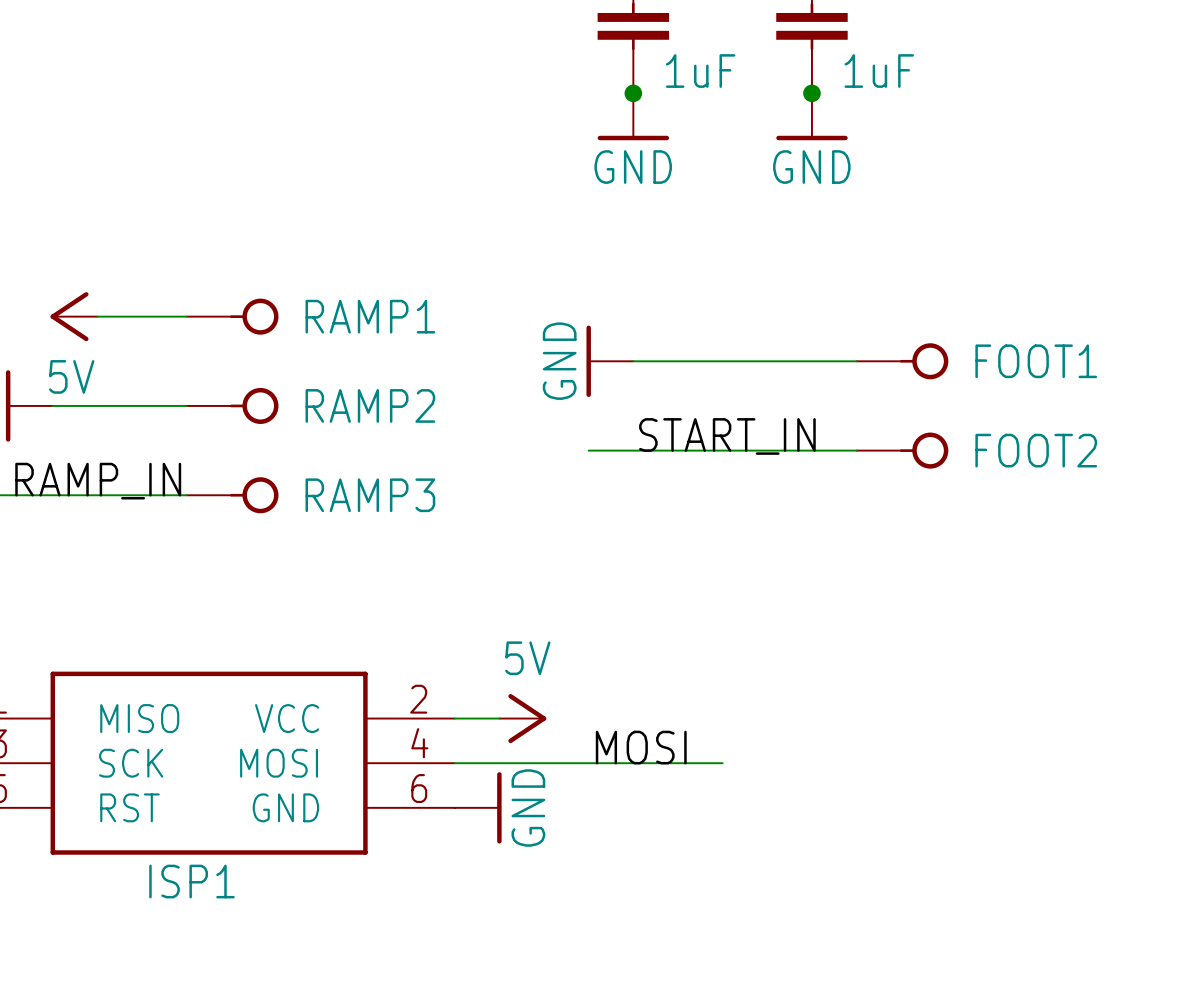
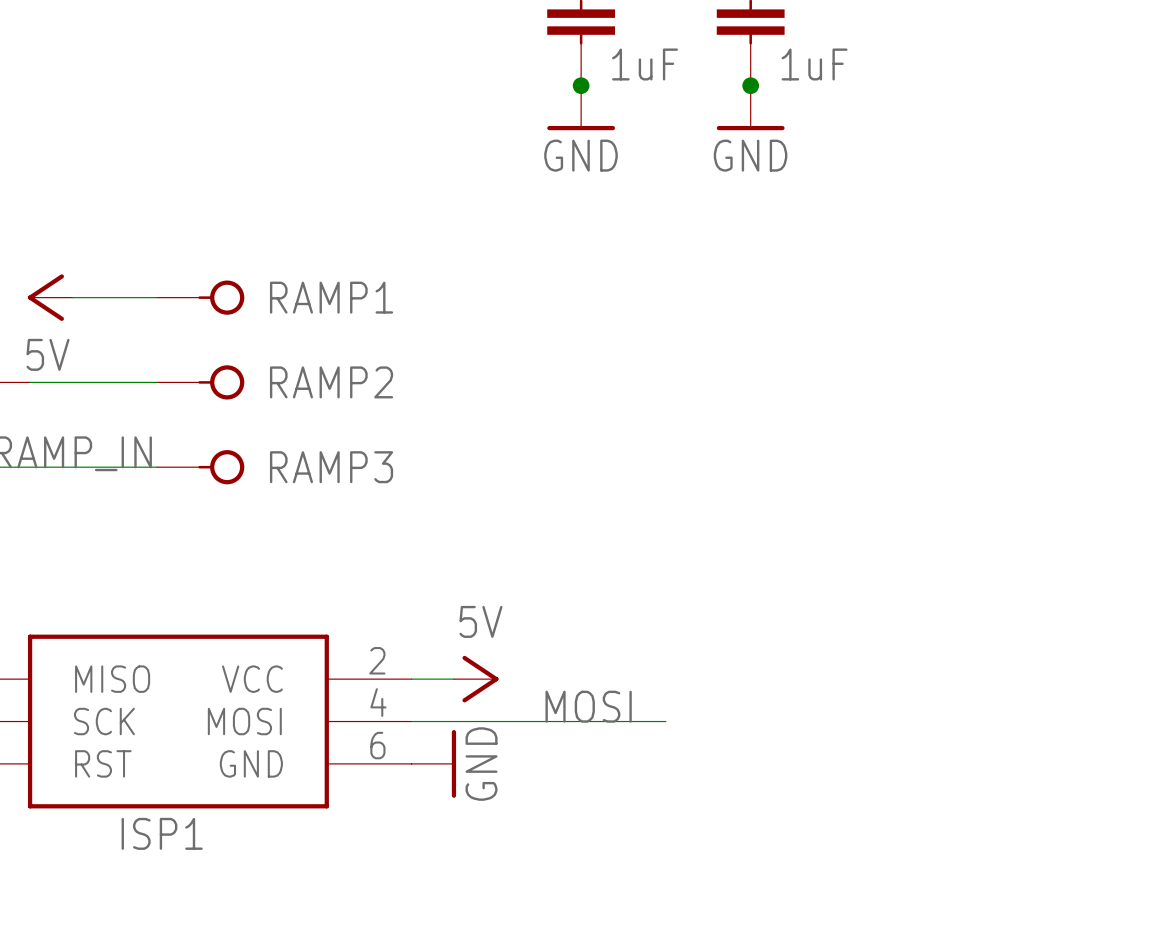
power symbol: GND (609, 361) -> none
wire: (633, 361) (856, 361) -> none
FOOT1: (902, 361) -> none
label: START_IN (727, 436) -> none
wire: (588, 450) (856, 450) -> none
FOOT2: (902, 450) -> none

